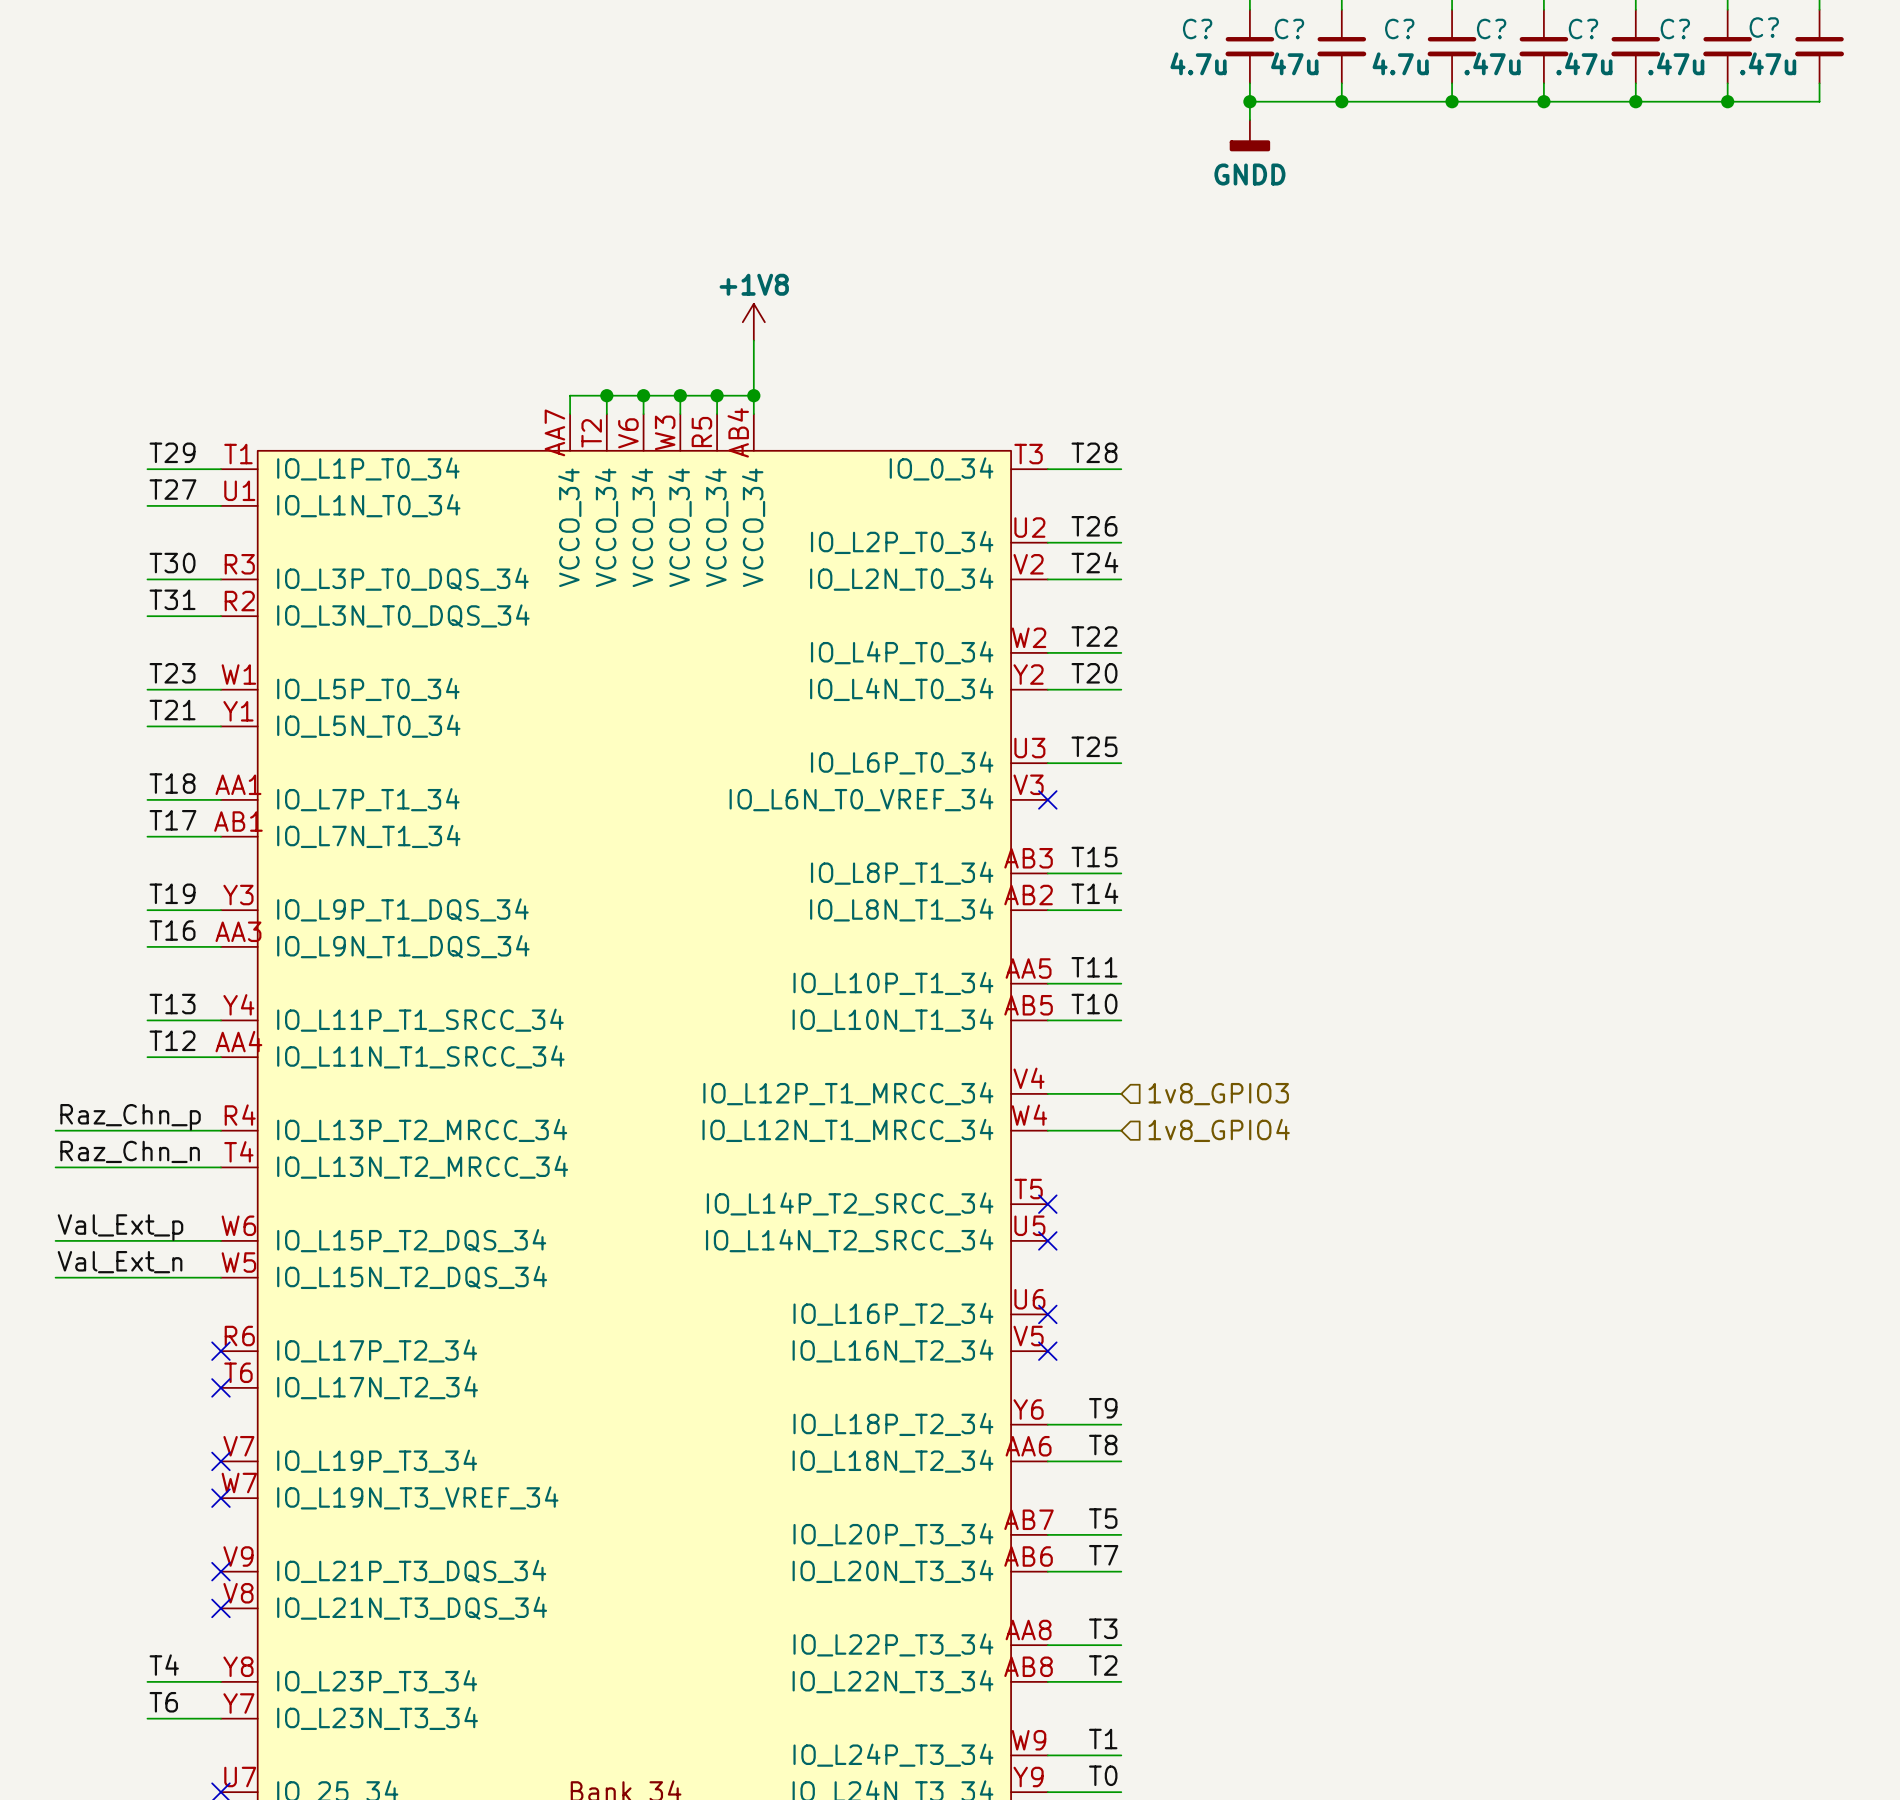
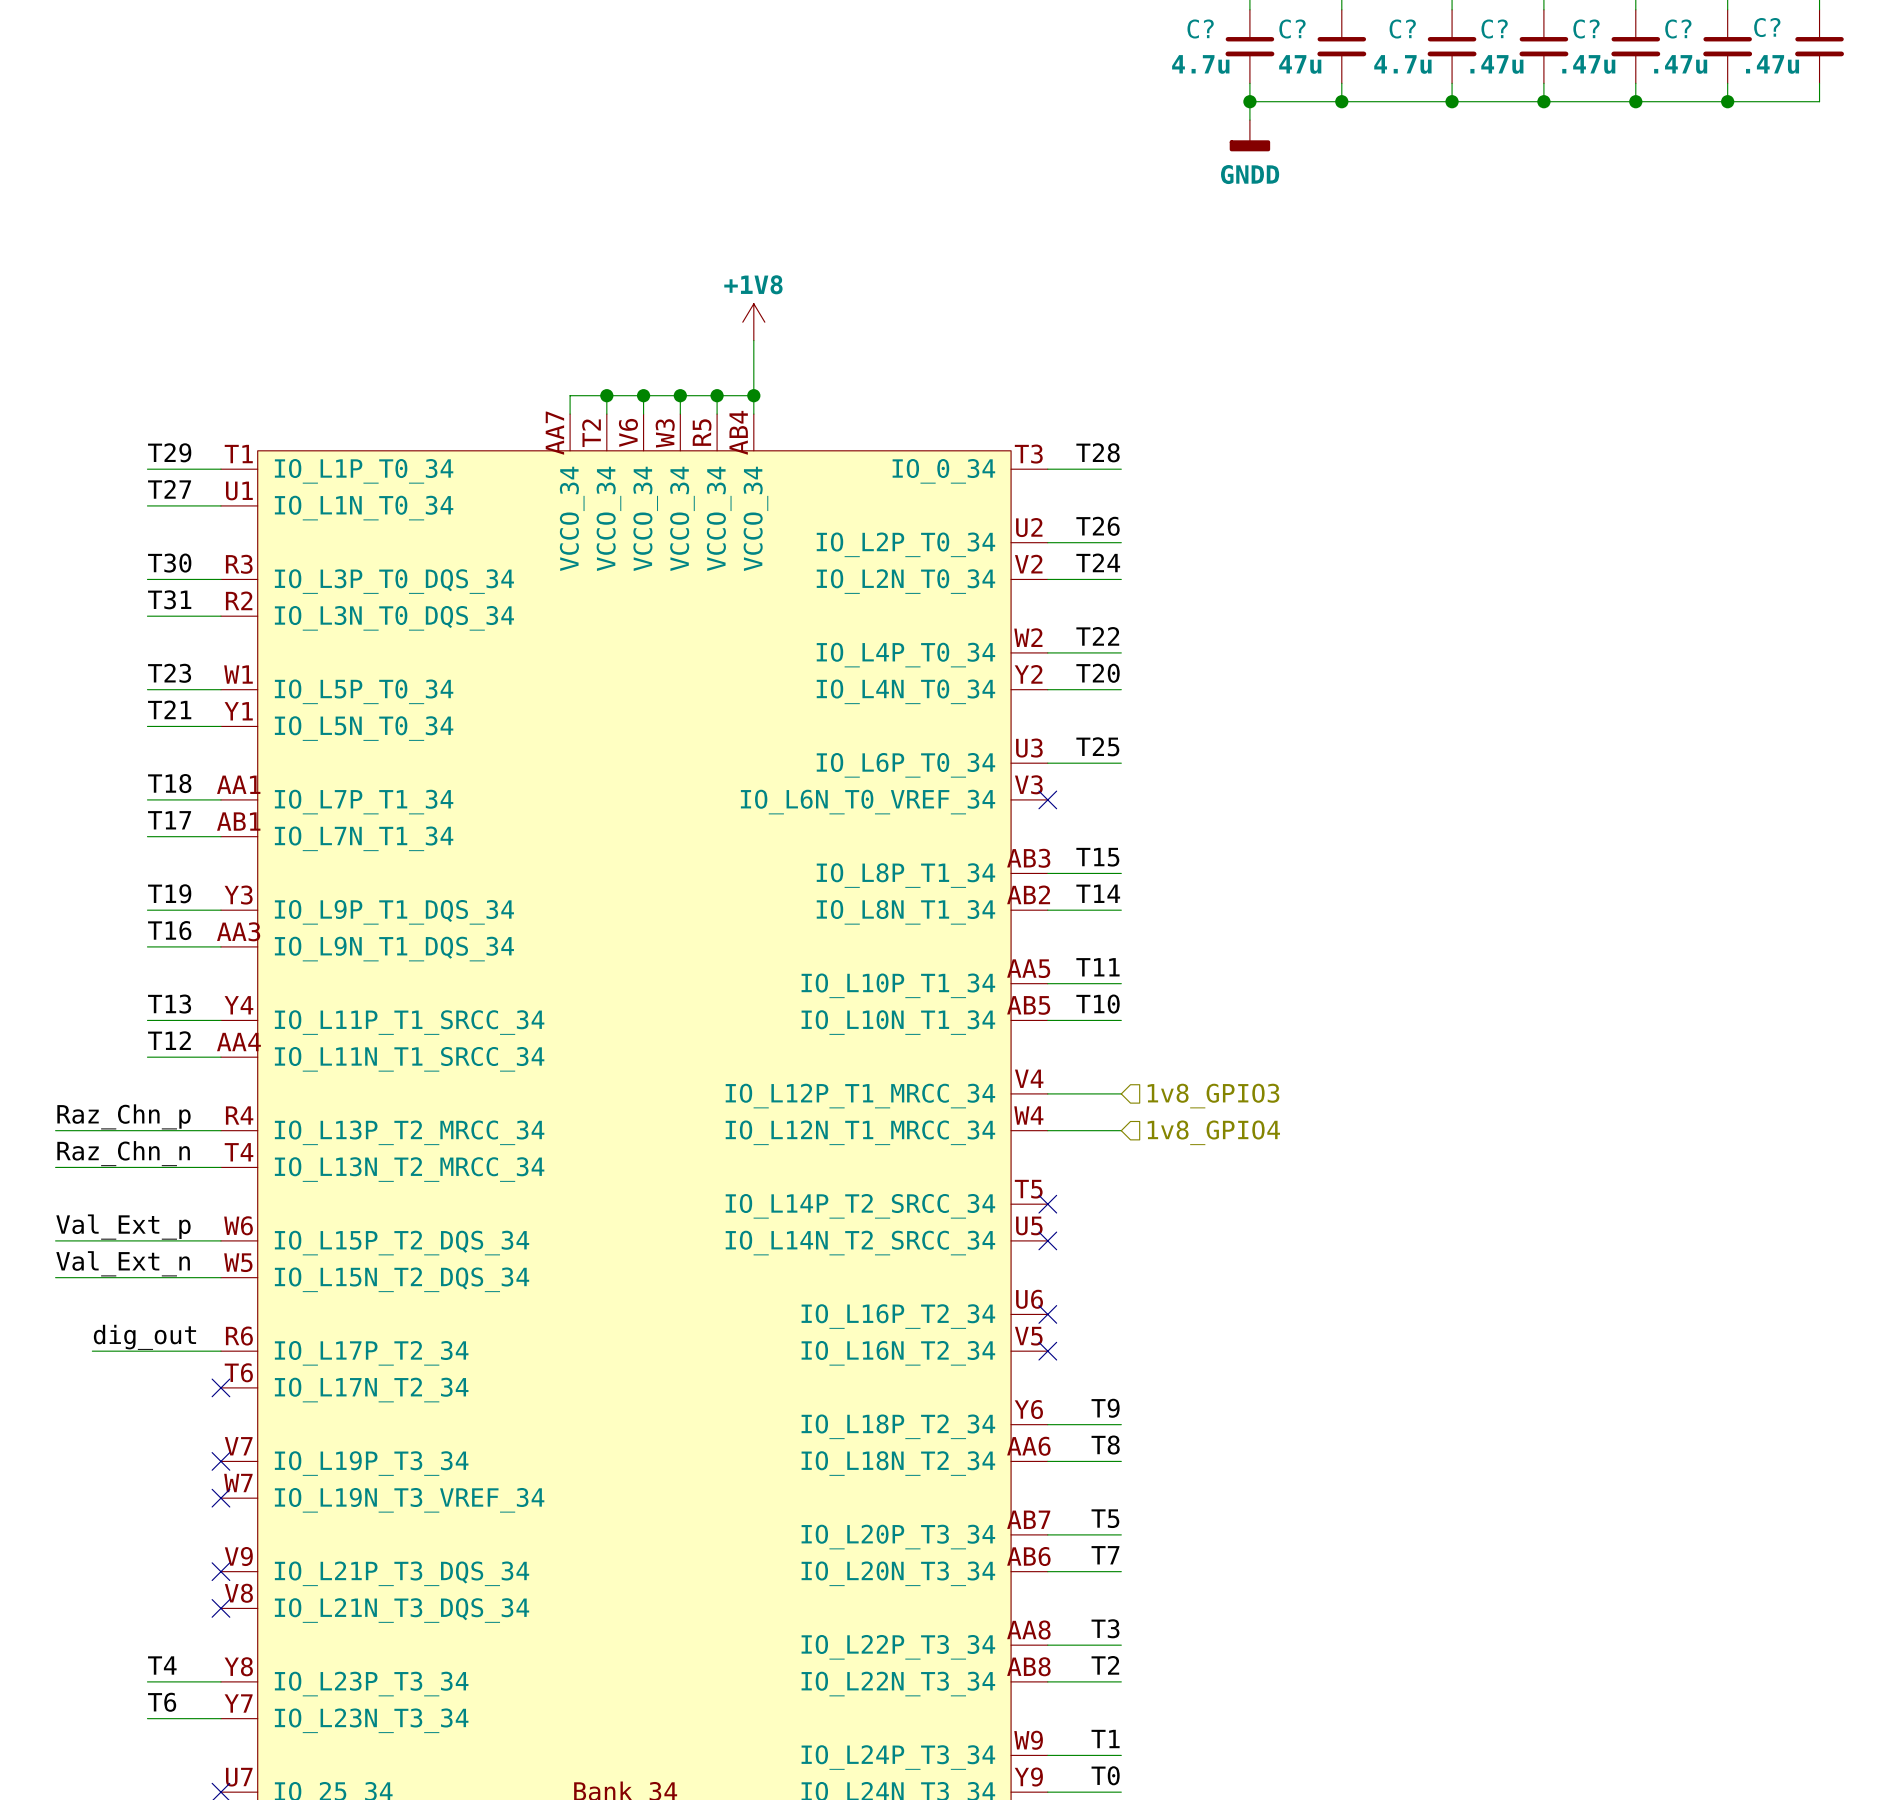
label: none -> dig_out (144, 1337)
wire: none -> (92, 1351) (220, 1351)
no-connect mark: (220, 1351) -> none

